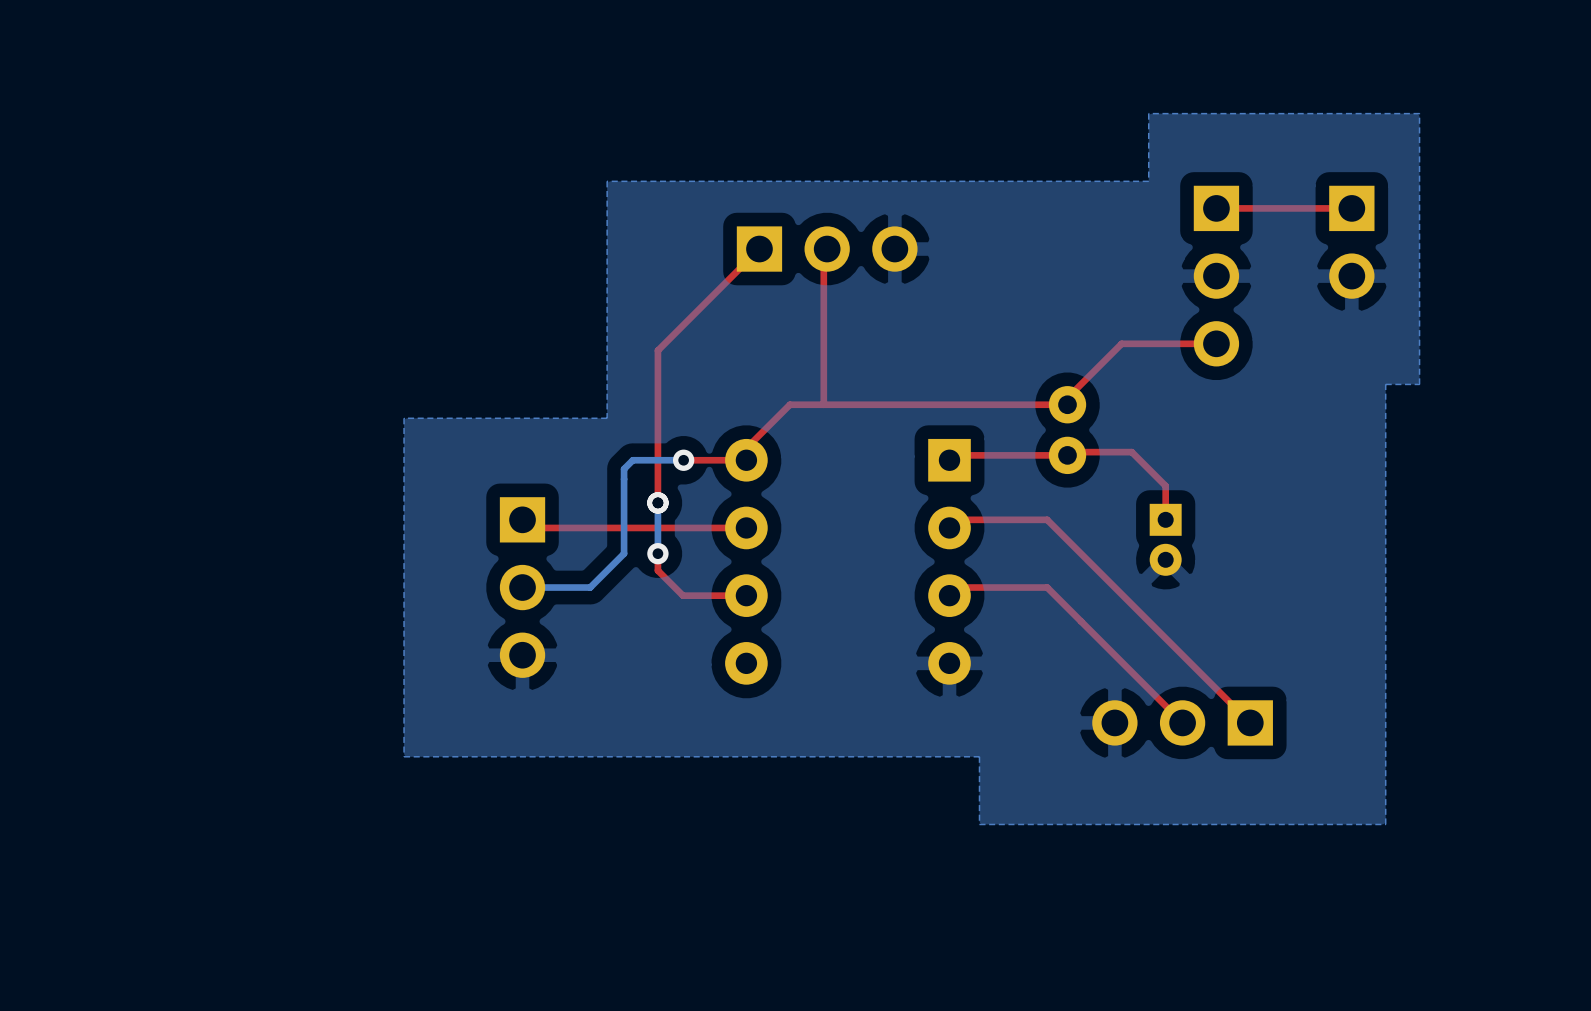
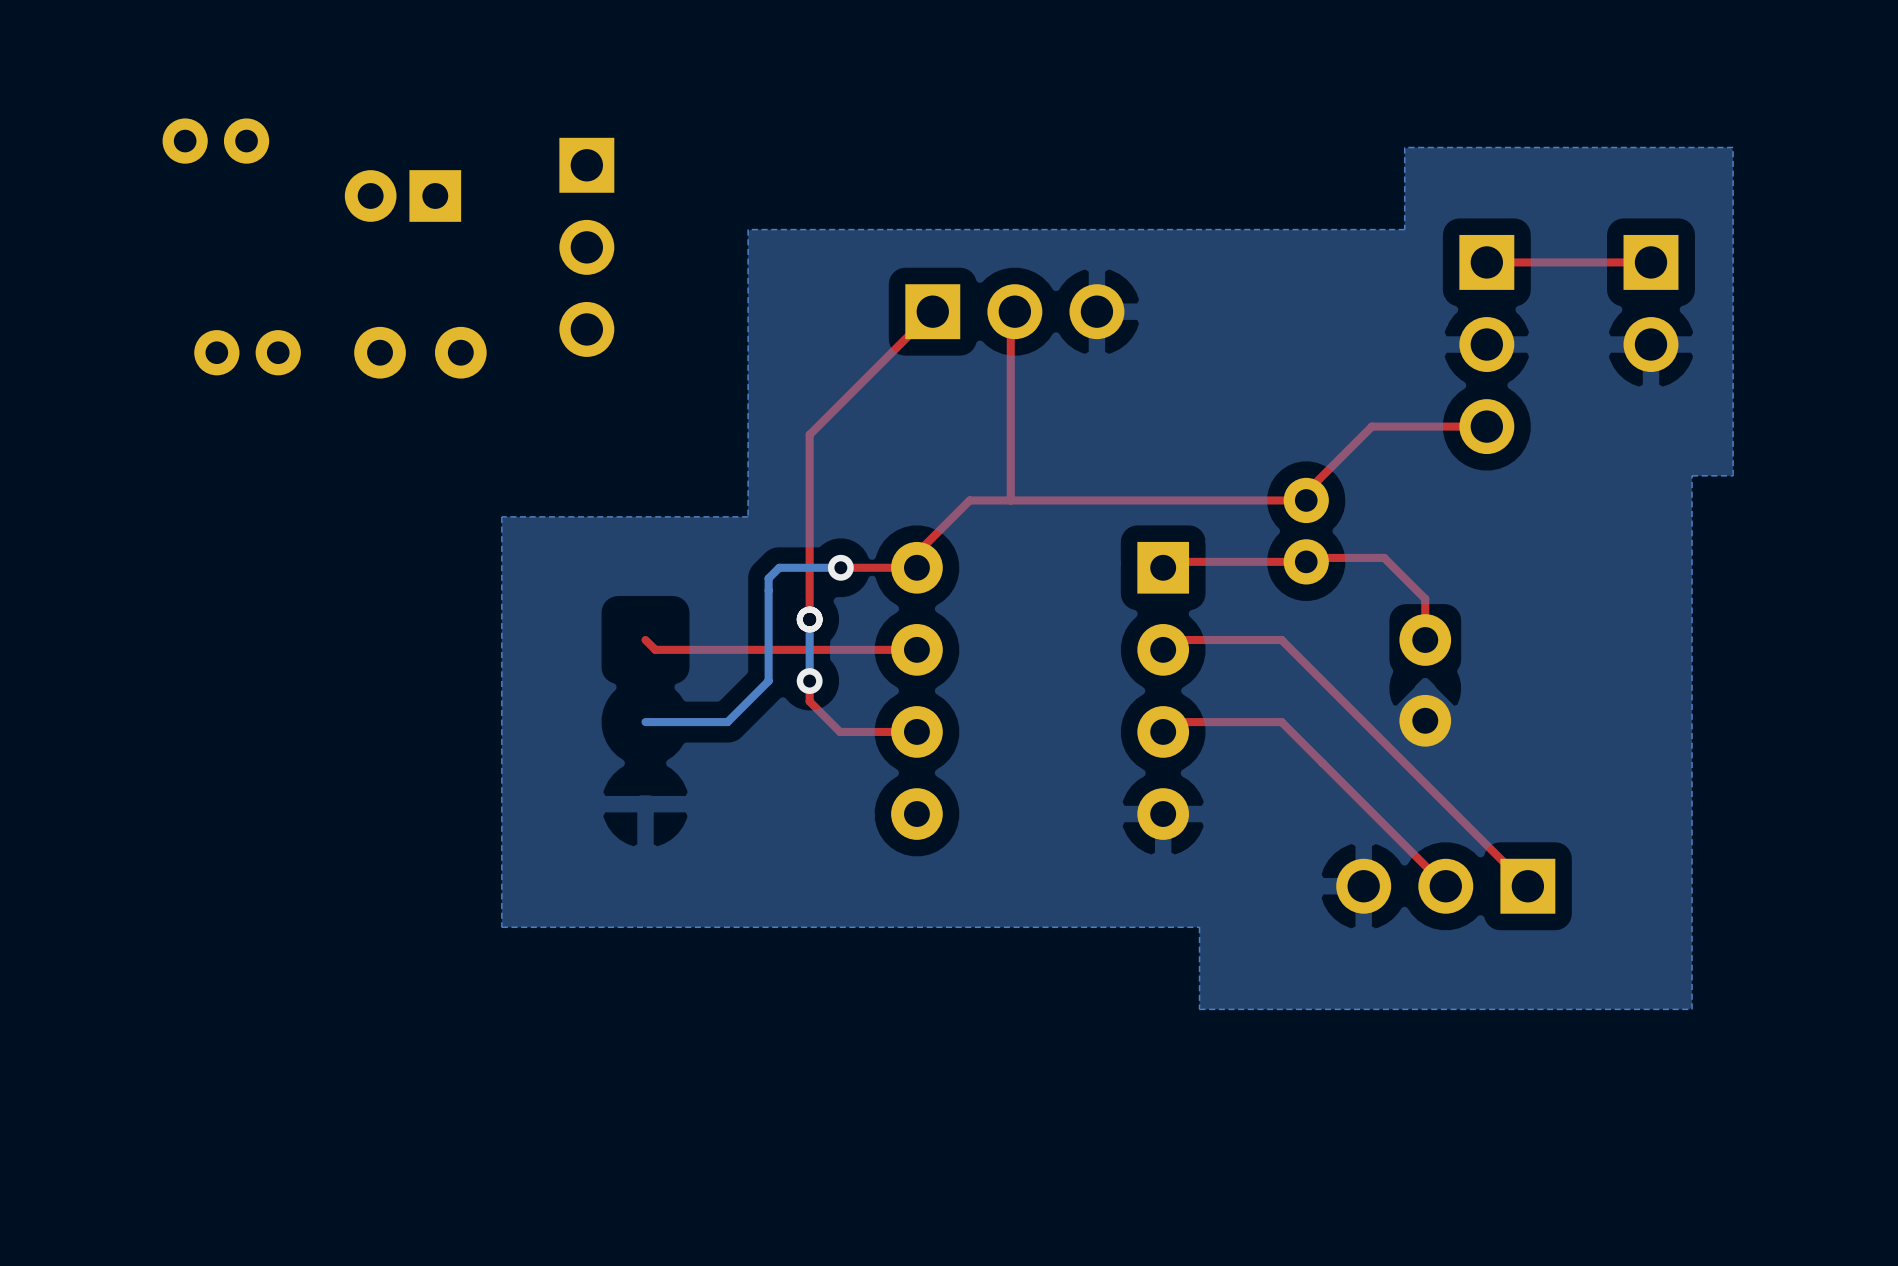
part: none -> (215, 141)
part: none -> (402, 195)
part: none -> (247, 352)
part: none -> (420, 352)
part footprint: [1149, 503, 1182, 576] -> [1399, 614, 1452, 747]
part position: (522, 587) -> (586, 247)

